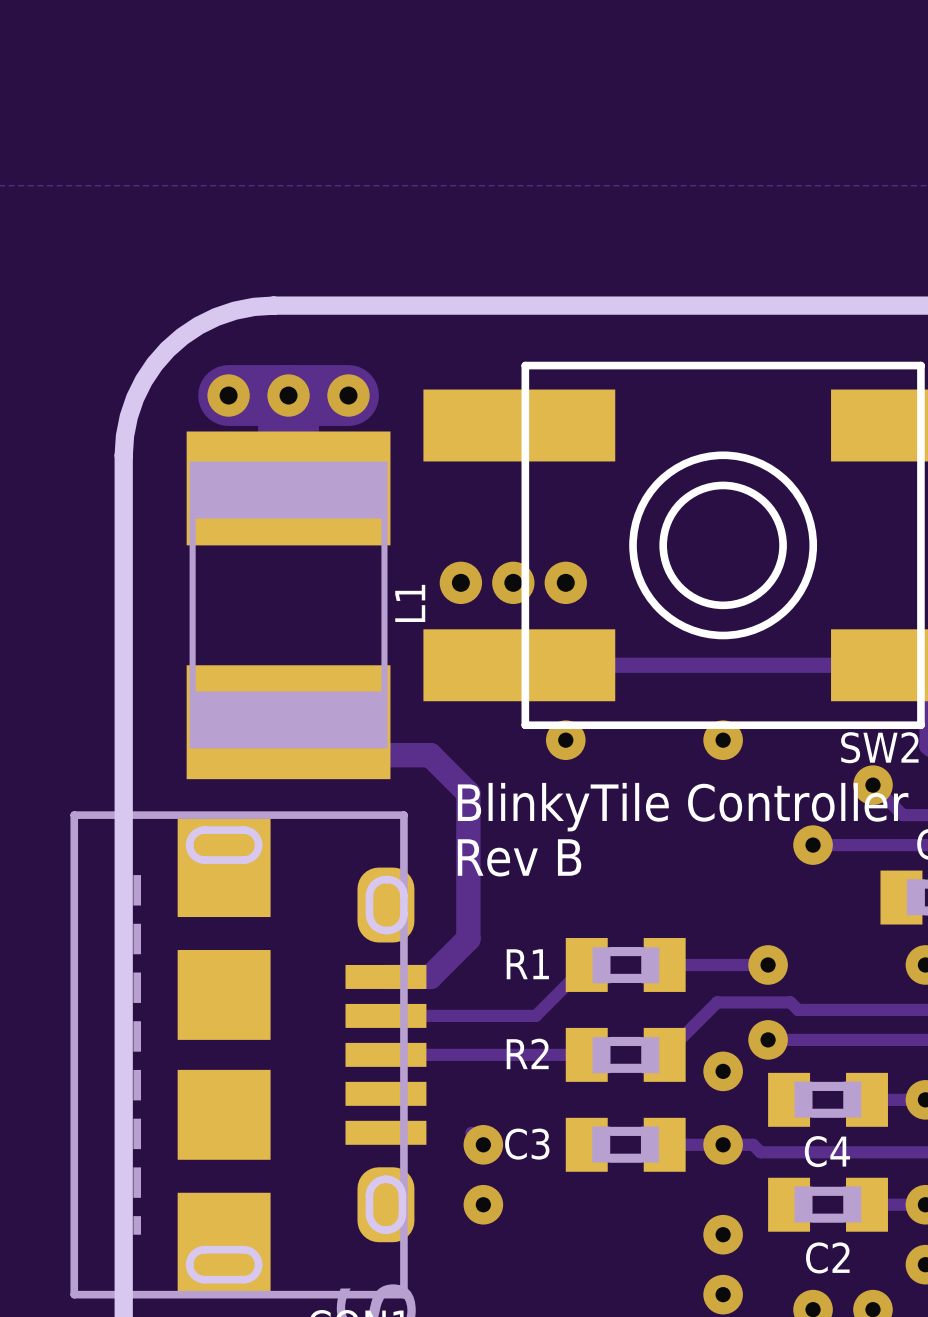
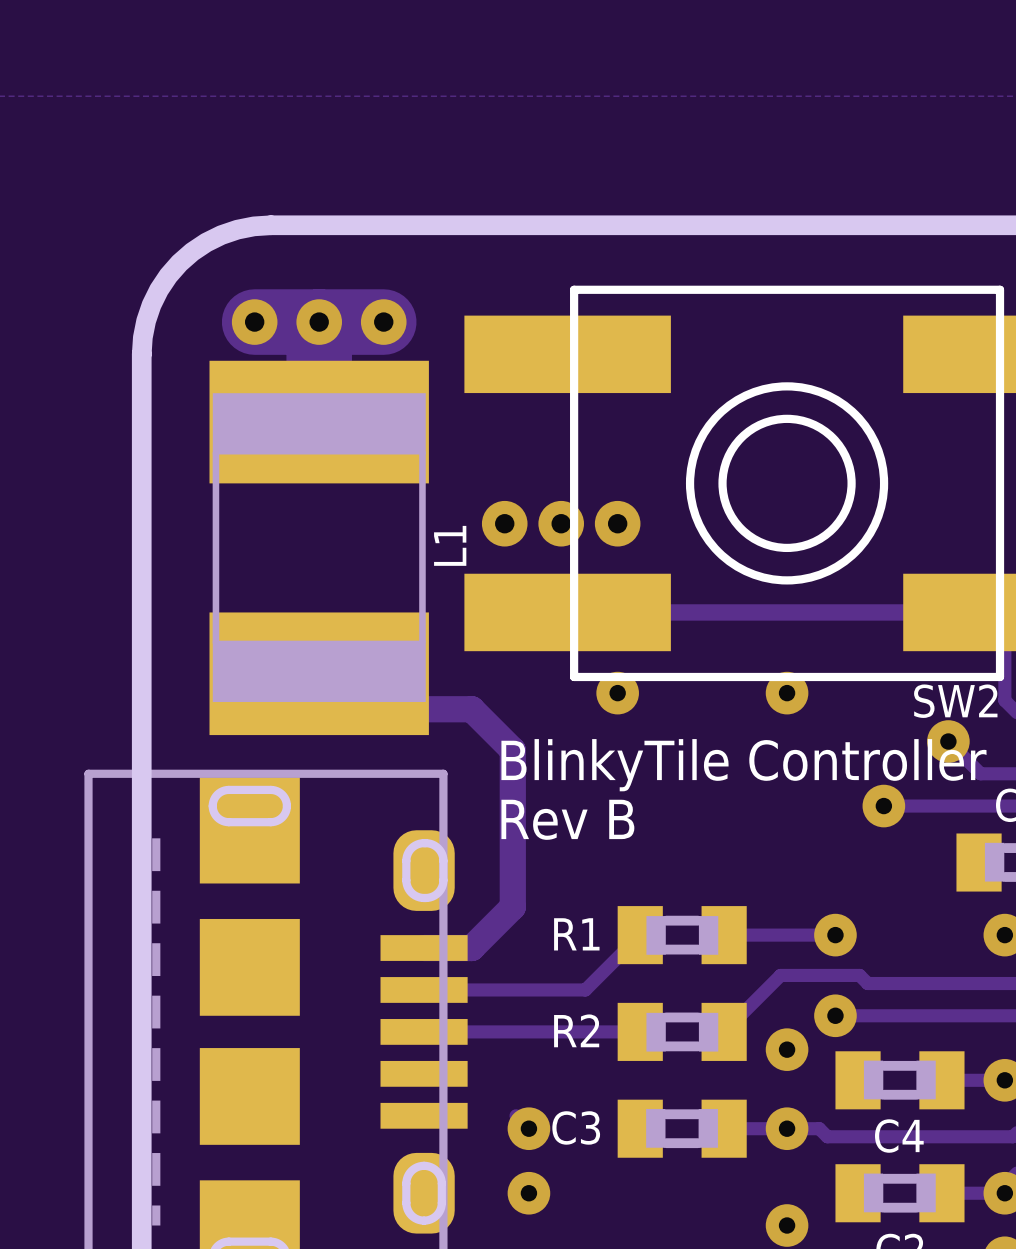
board edge: (273, 305) (254, 306) (216, 317) (198, 325) (167, 349) (143, 380) (135, 398) (124, 435) (123, 455) -> (303, 225) (253, 226) (237, 229) (206, 242) (179, 263) (159, 289) (146, 320) (142, 337) (141, 386)

